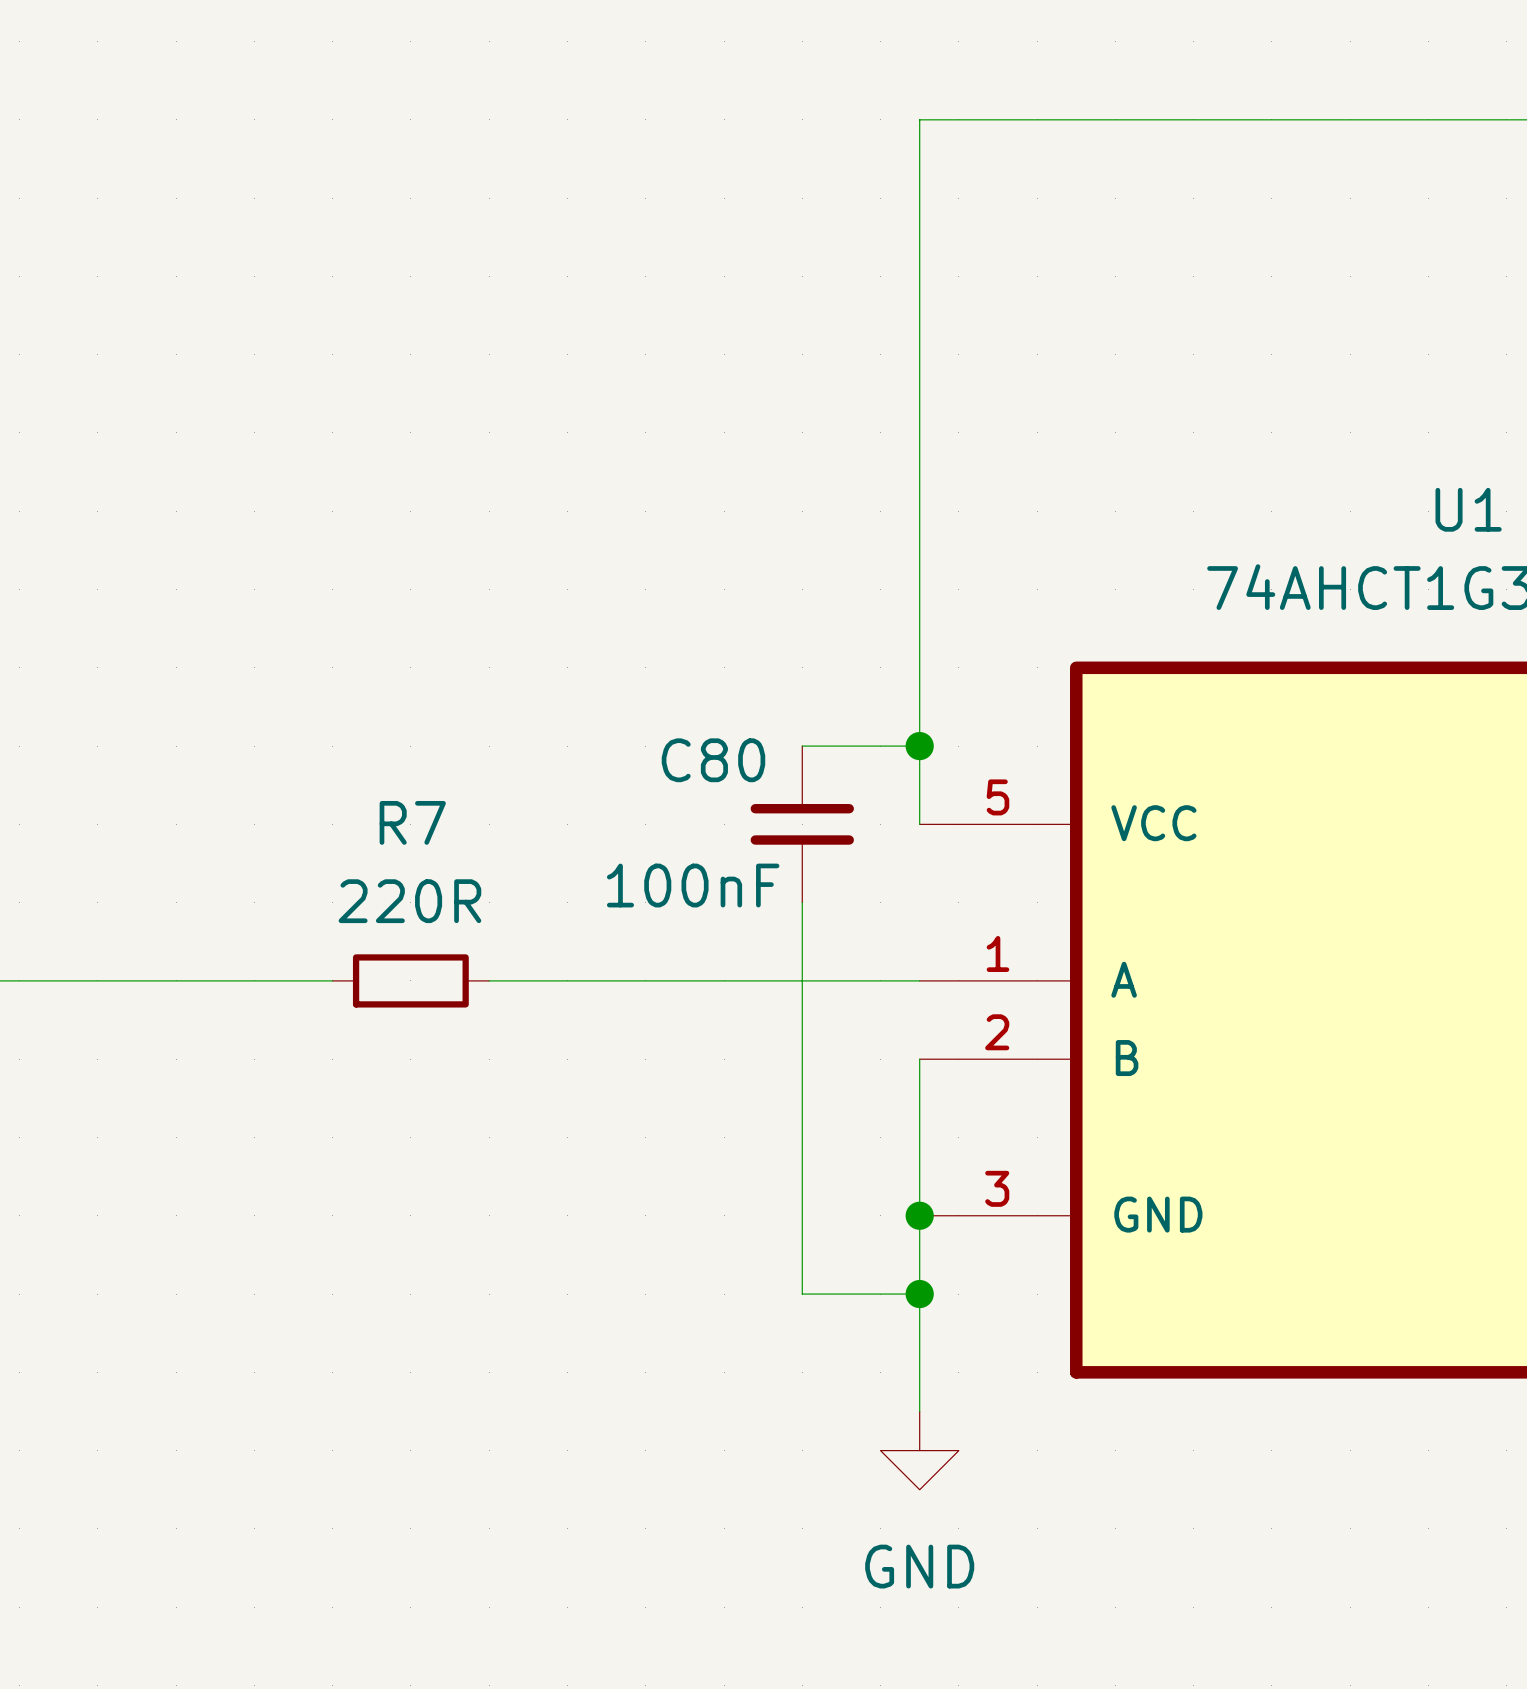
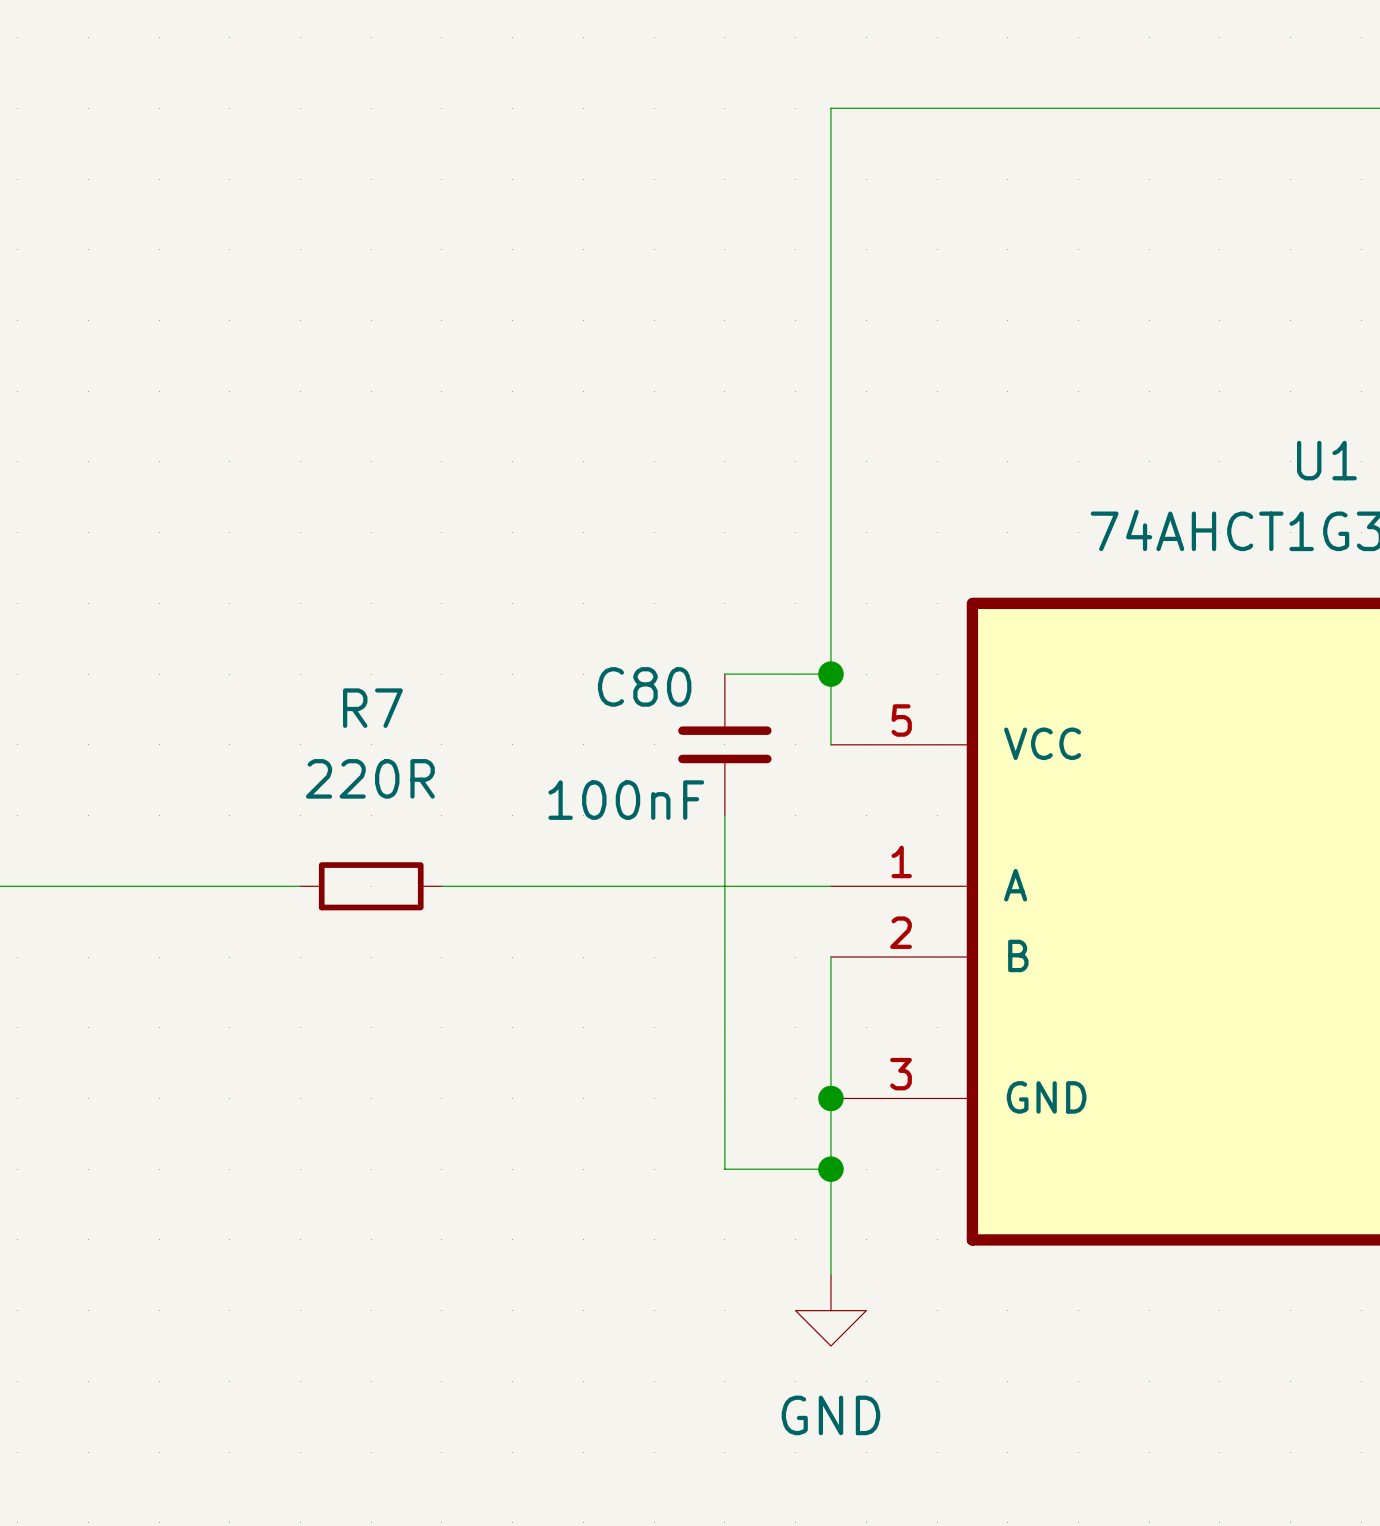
R7 name position: R7 (412, 822) -> R7 (372, 708)
R7 value position: 220R (409, 901) -> 220R (370, 778)

